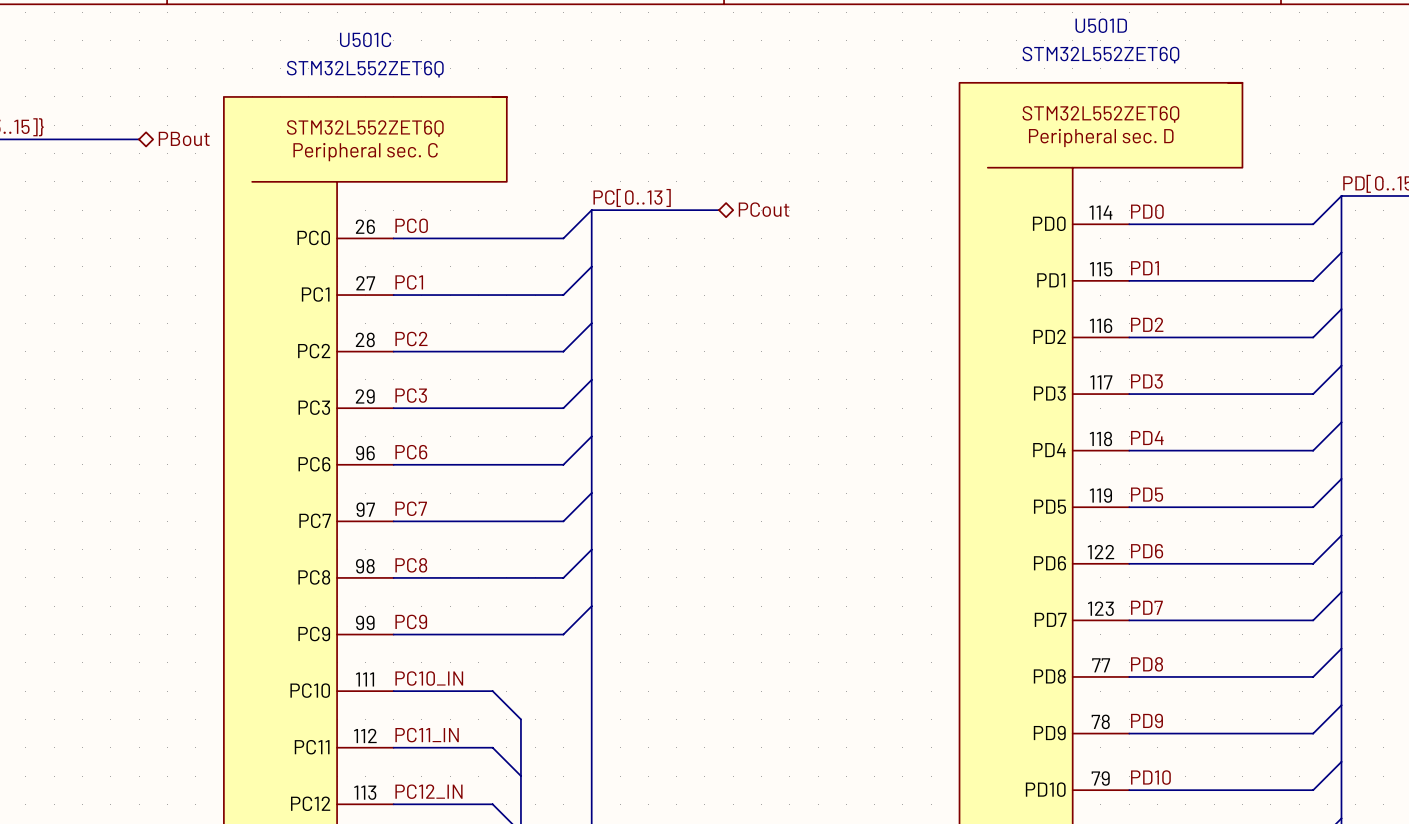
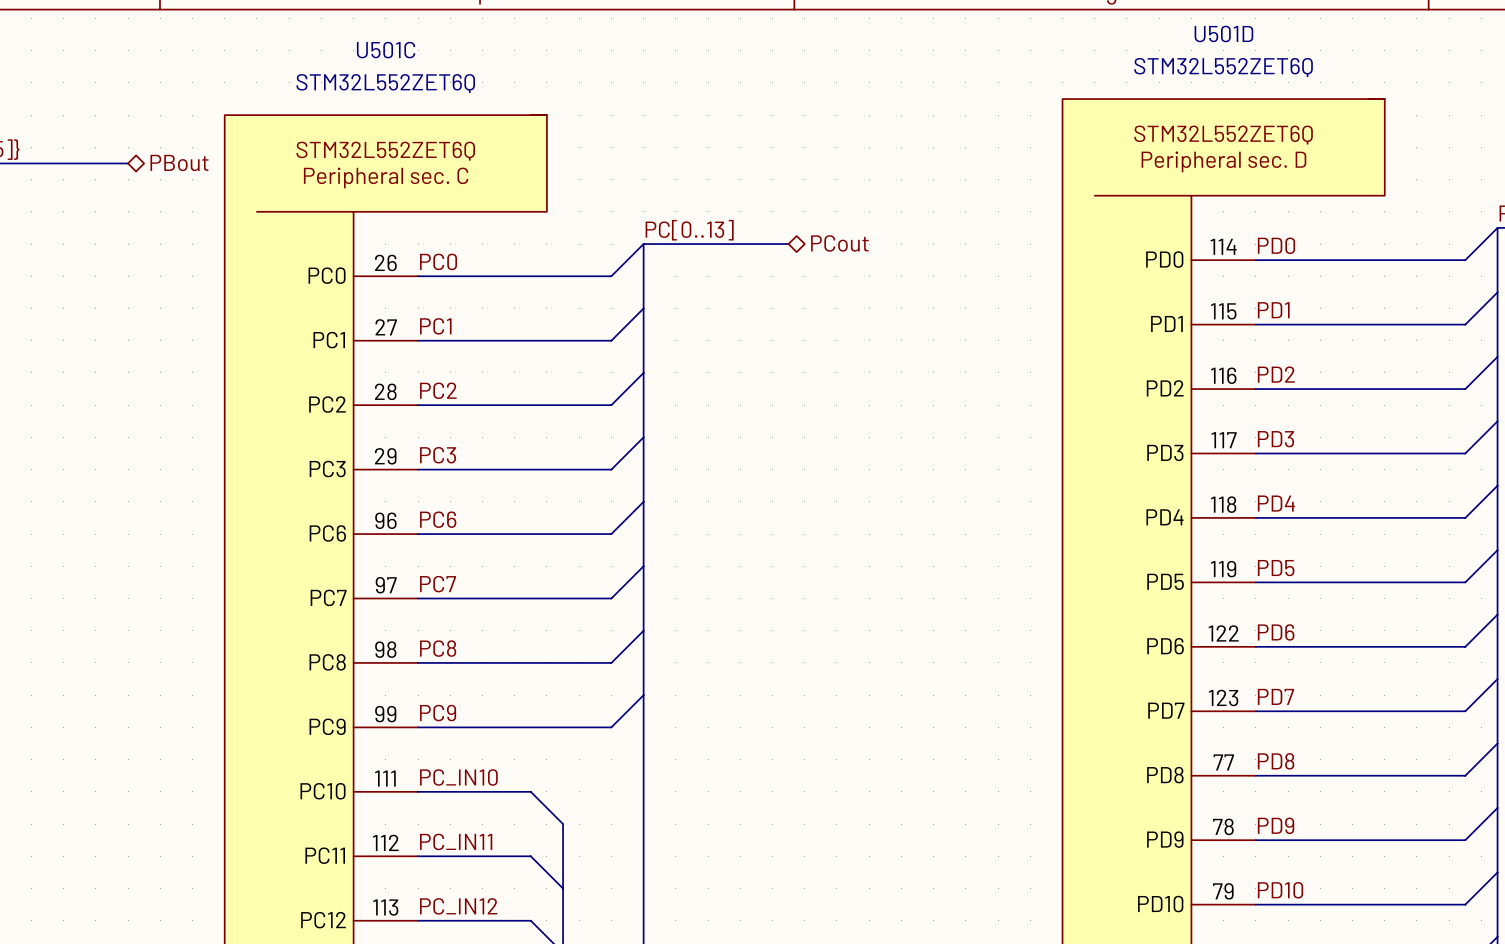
label: PC10_IN (429, 678) -> PC_IN10 (458, 777)
label: PC11_IN (427, 735) -> PC_IN11 (456, 841)
label: PC12_IN (428, 791) -> PC_IN12 (458, 906)

